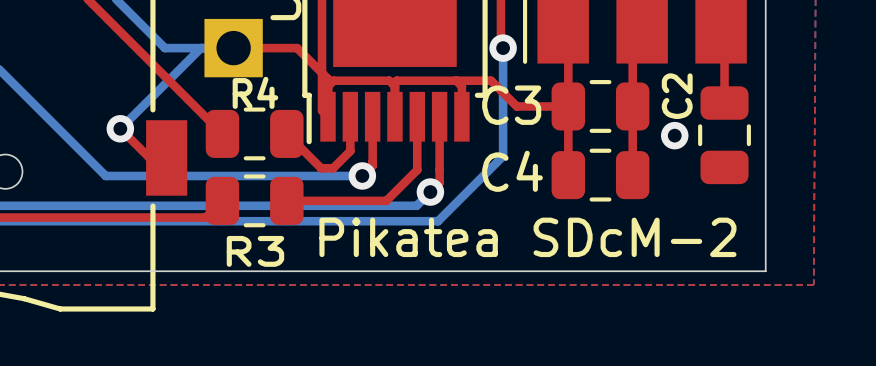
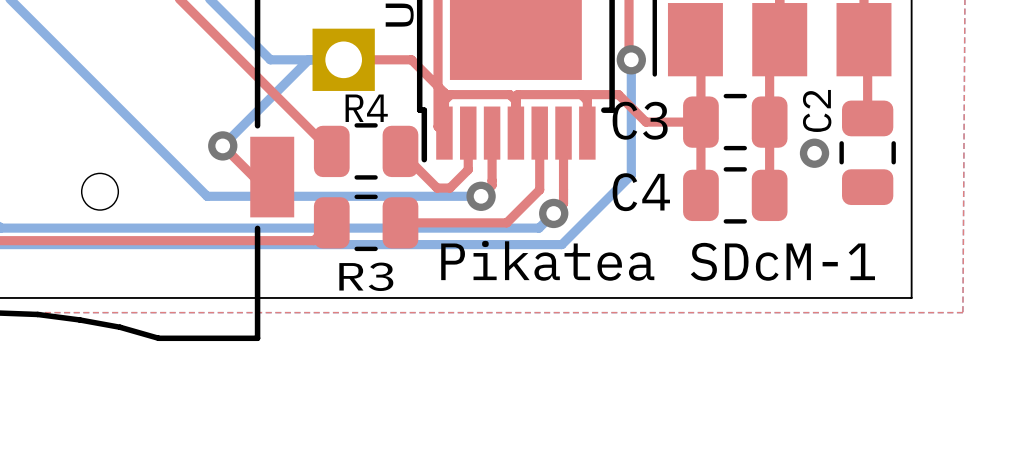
text: Pikatea SDcM-2 (527, 237) -> Pikatea SDcM-1 (658, 260)

